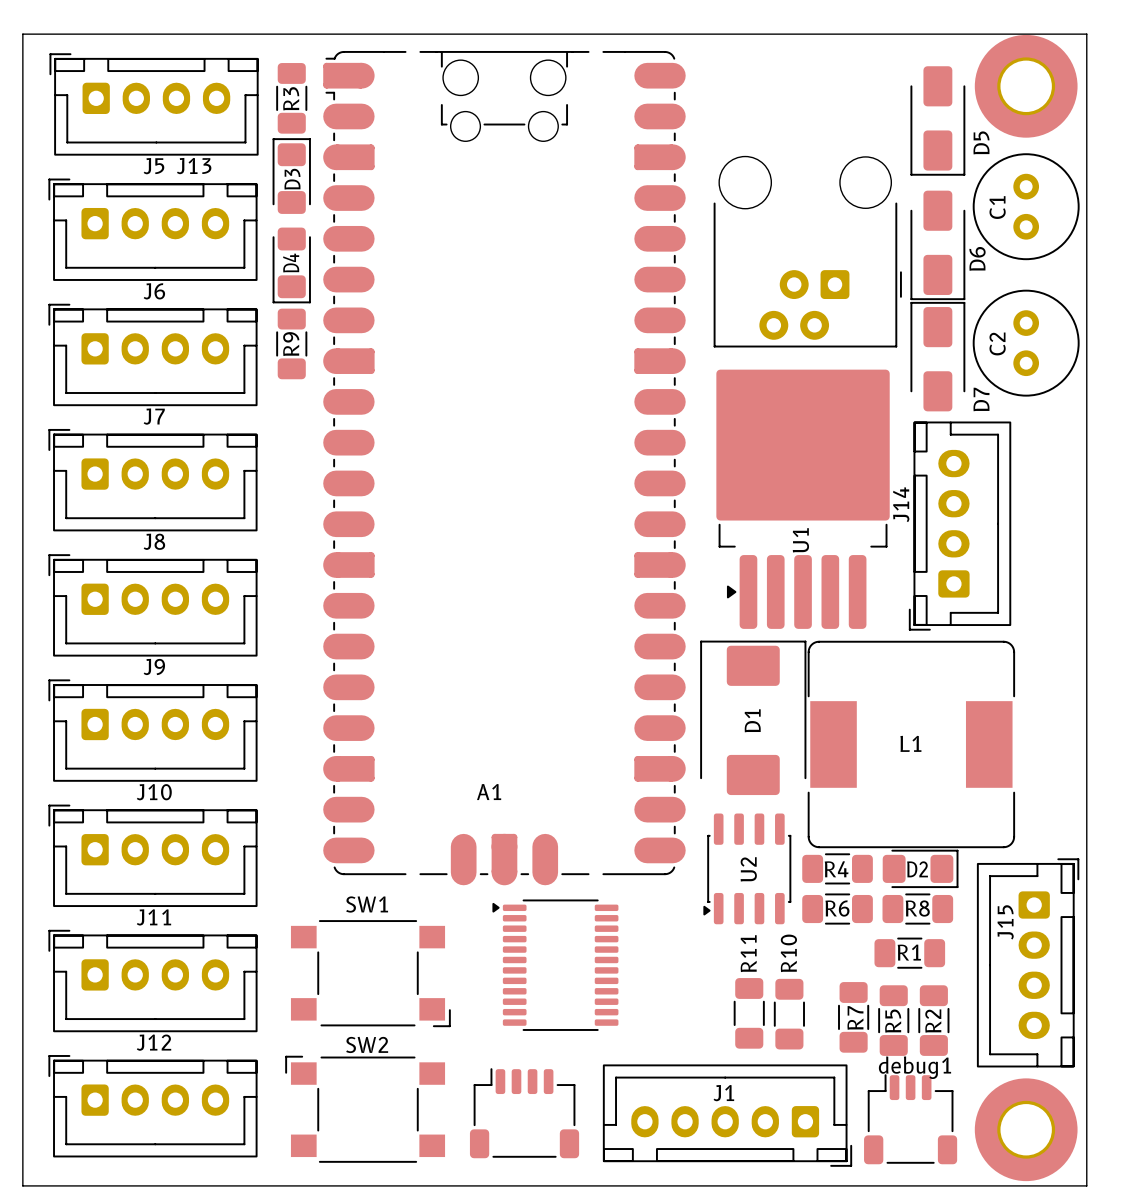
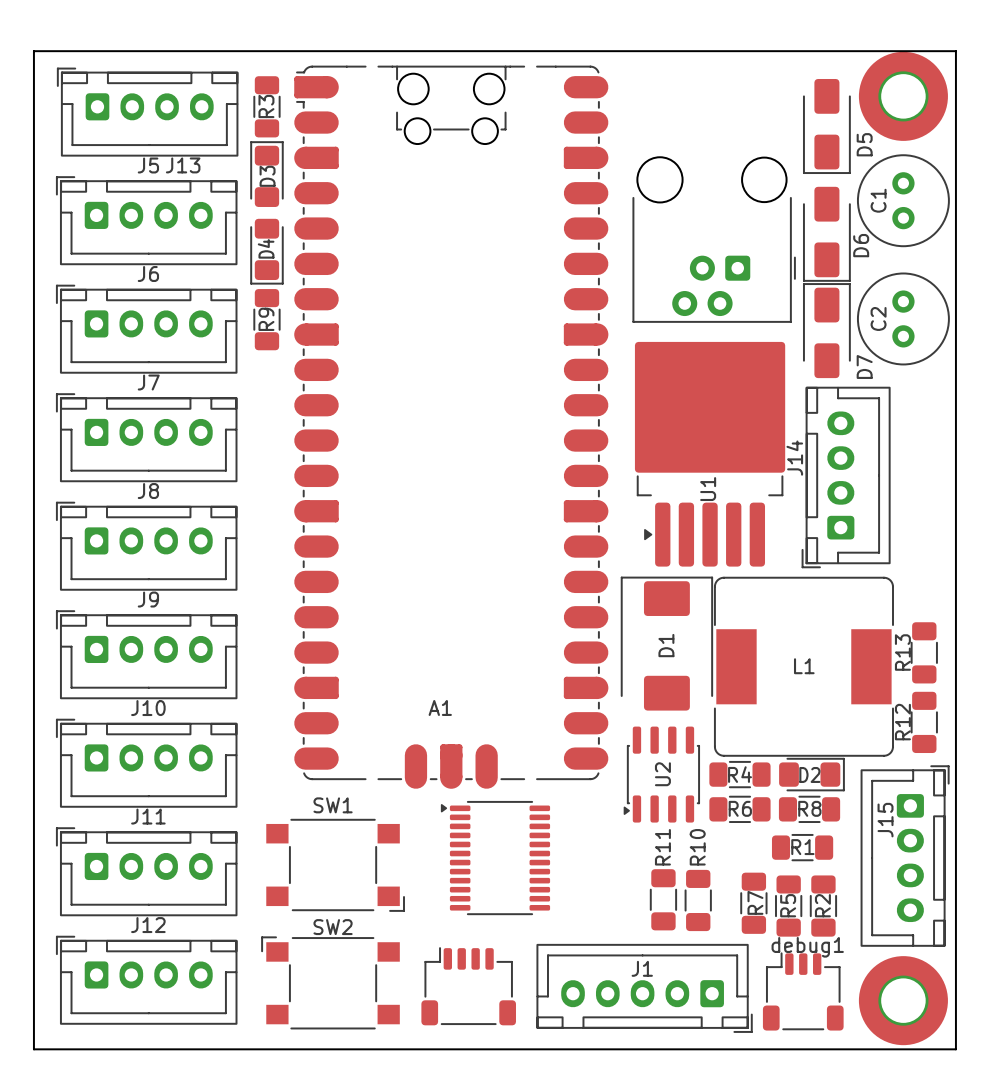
R13: none -> (924, 652)
R12: none -> (924, 722)

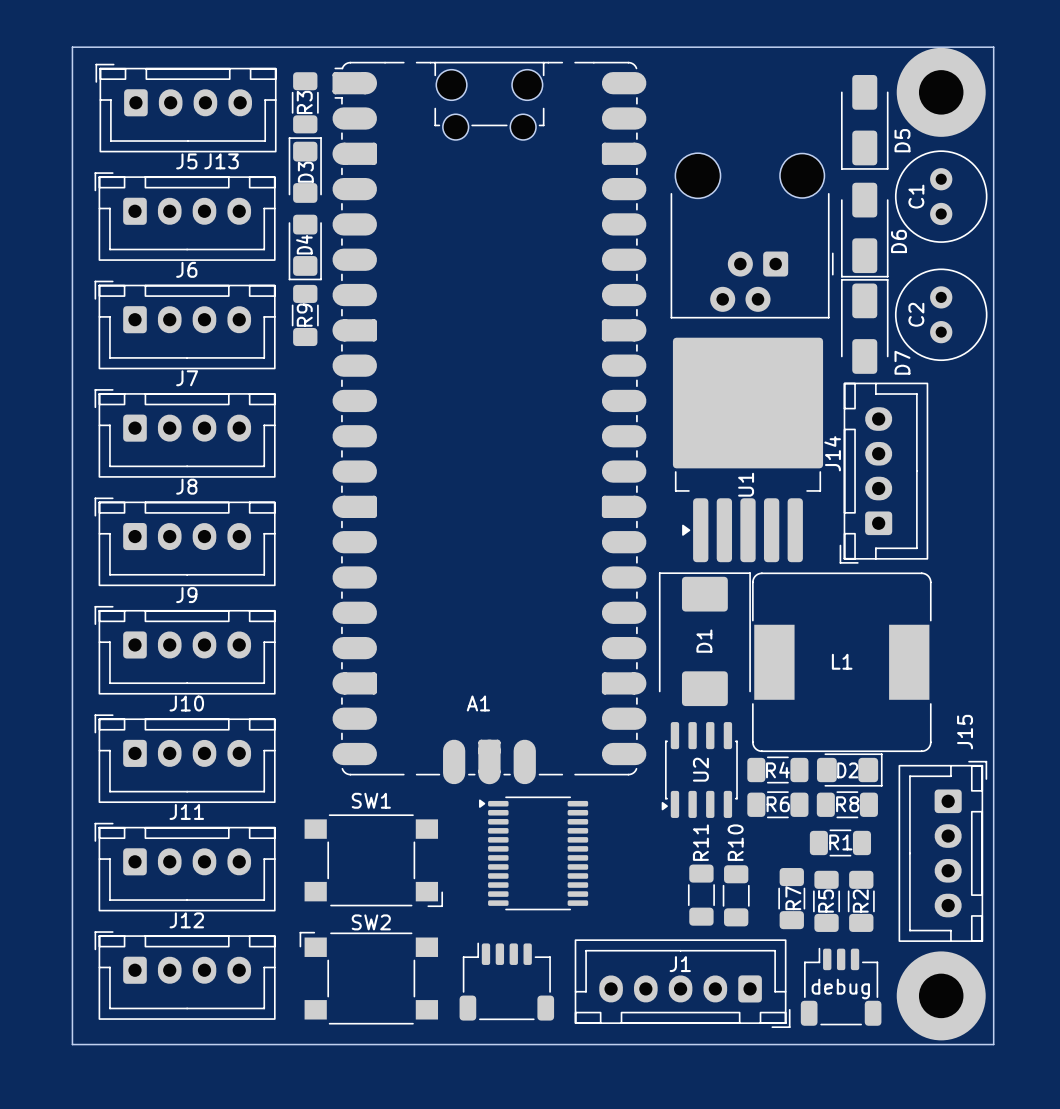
R13: (924, 652) -> none
R12: (924, 722) -> none
J15 name position: J15 (885, 820) -> J15 (965, 732)
debug1 name: debug1 (807, 947) -> debug (840, 989)

